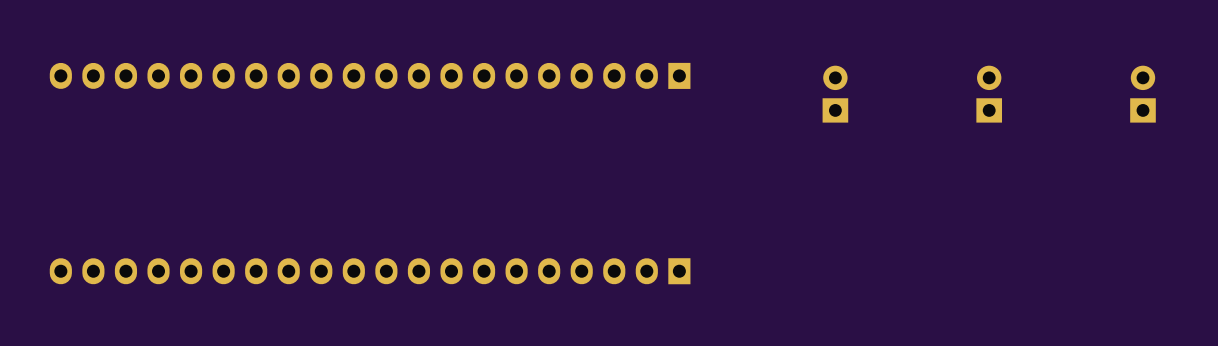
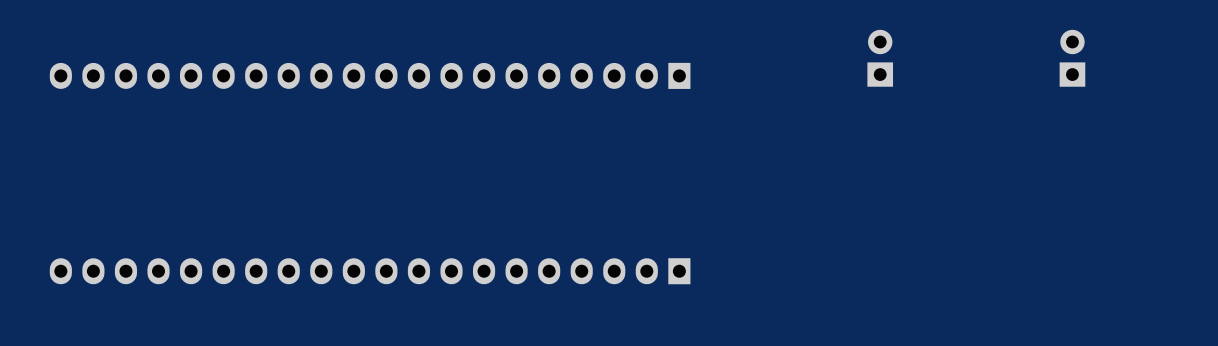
part: none -> (880, 58)
part: none -> (1072, 58)
part: (835, 94) -> none
part: (989, 94) -> none
part: (1142, 94) -> none

